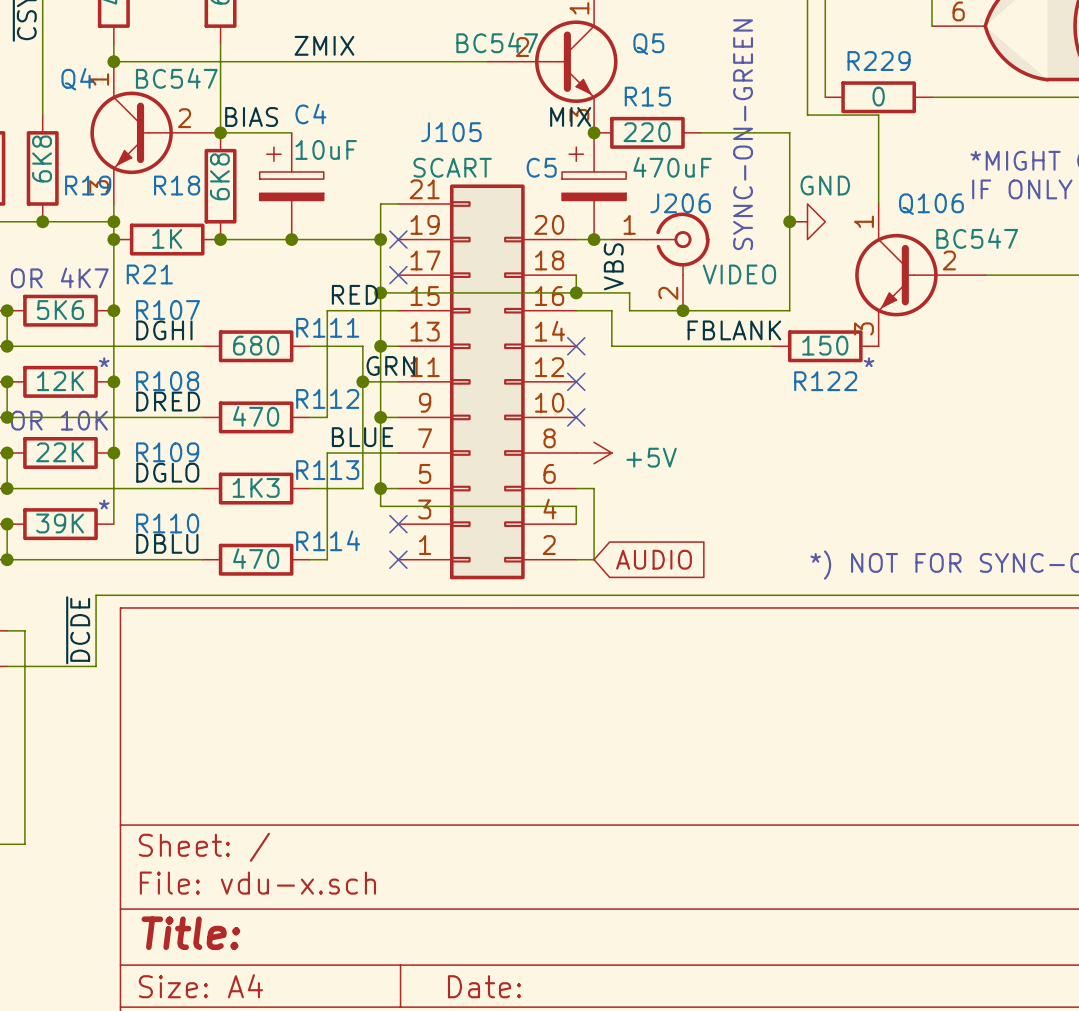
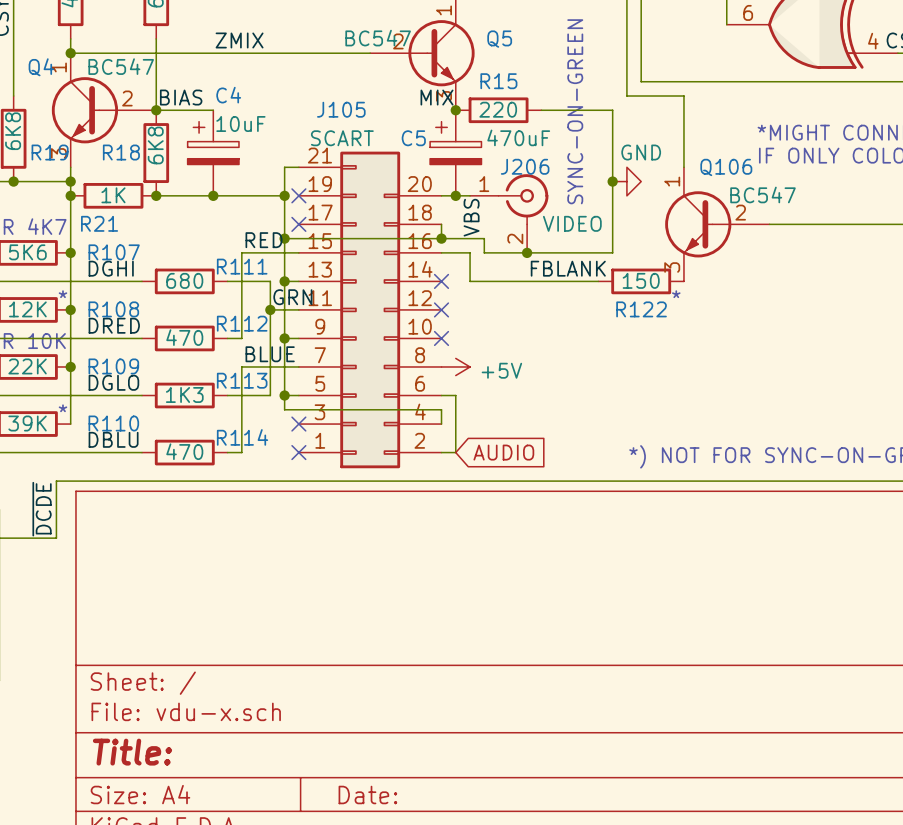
wire: none -> (641, 81) (726, 81)
R229: 0 (878, 97) -> none

